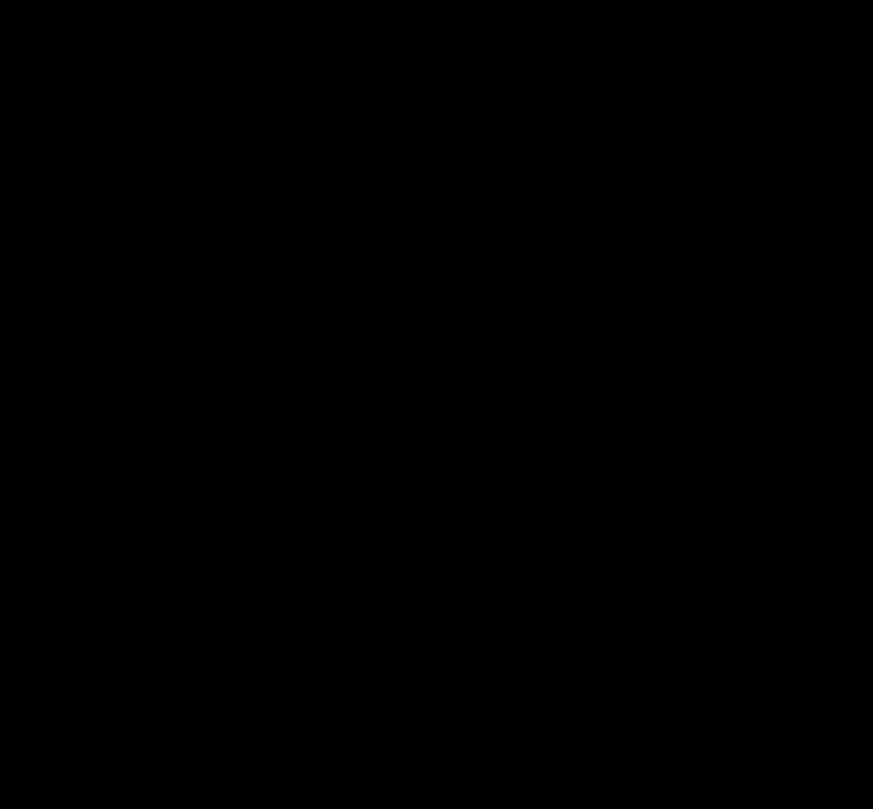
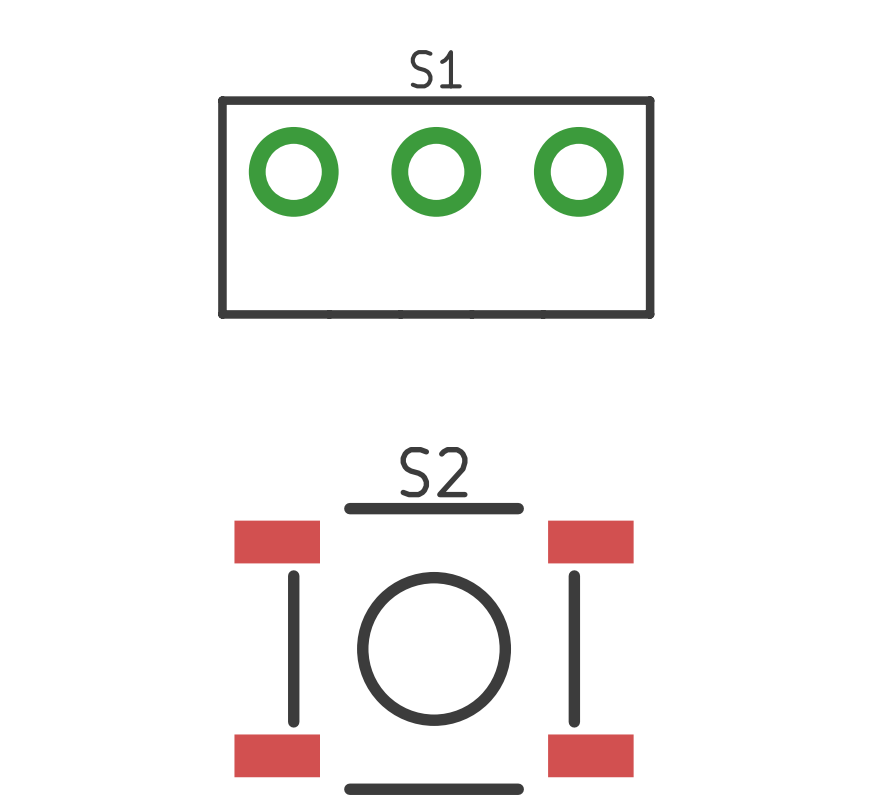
S1: none -> (436, 207)
S2: none -> (434, 648)

